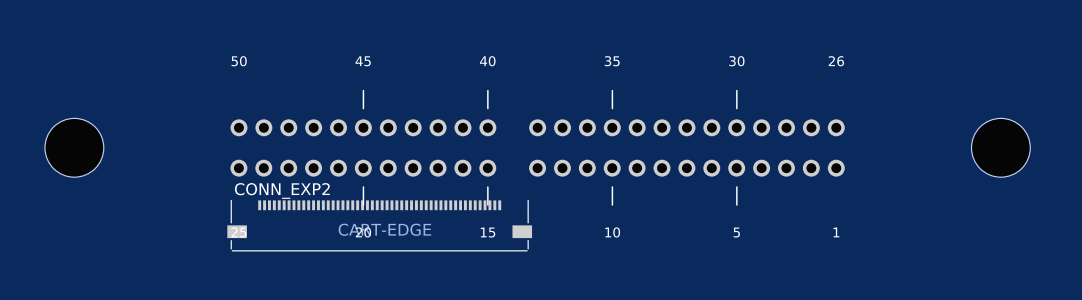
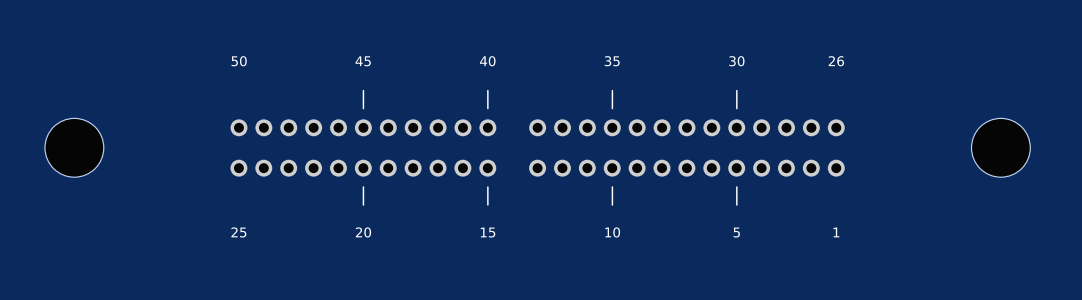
CONN_EXP2: CART-EDGE (379, 225) -> none

